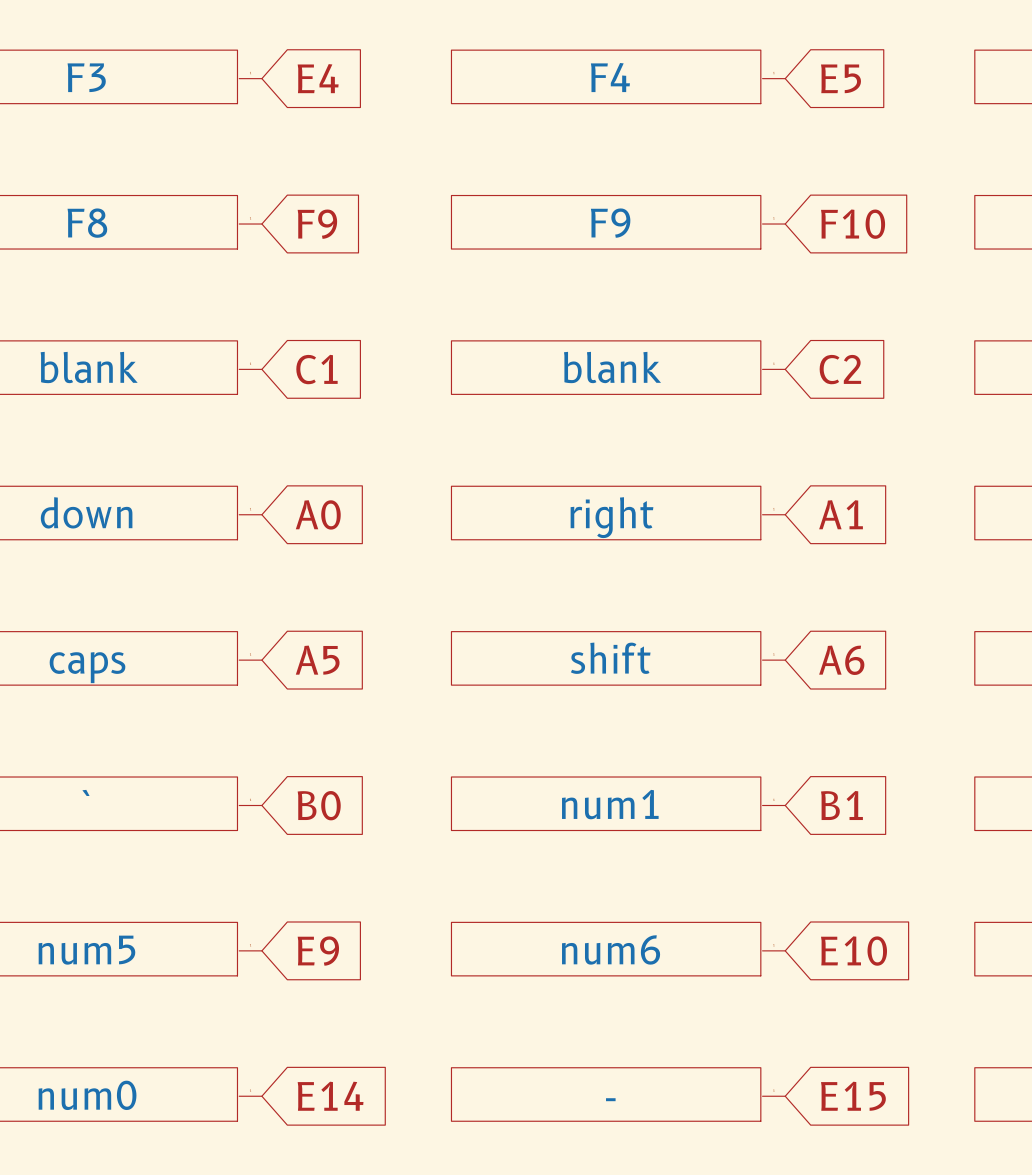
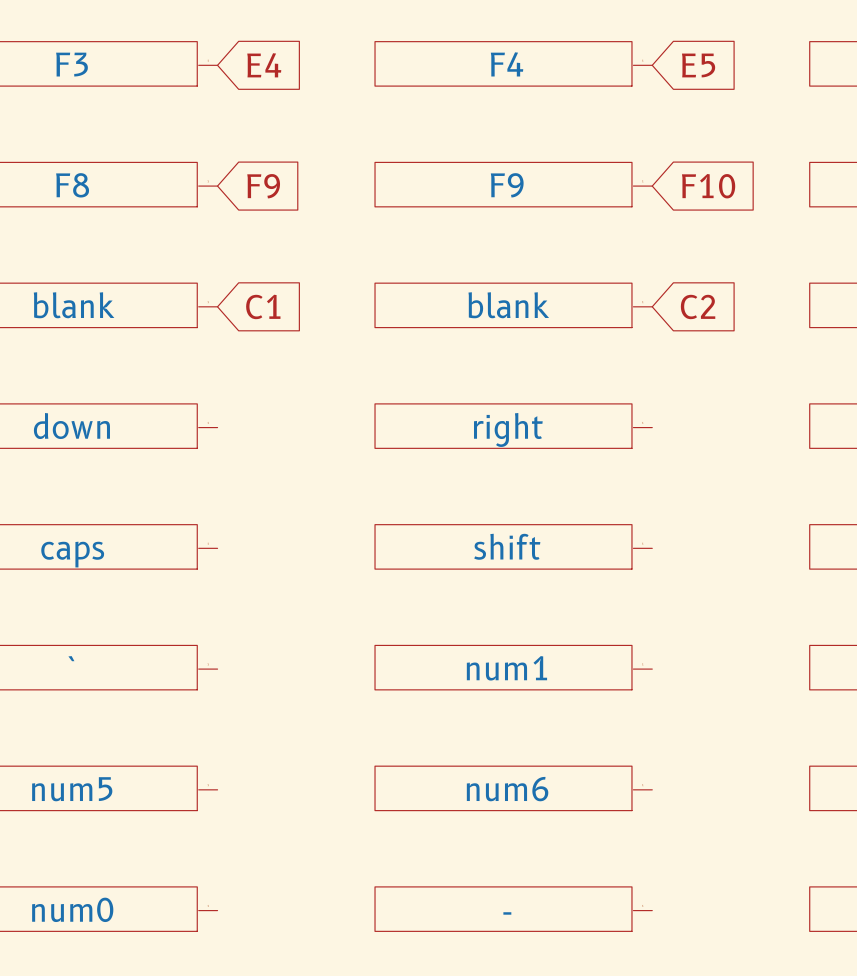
global label: A0 (318, 514) -> none
global label: A1 (841, 514) -> none
global label: A5 (317, 660) -> none
global label: A6 (841, 660) -> none
global label: B0 (319, 805) -> none
global label: B1 (841, 805) -> none
global label: E9 (318, 951) -> none
global label: E10 (854, 951) -> none
global label: E14 (330, 1096) -> none
global label: E15 (853, 1096) -> none

